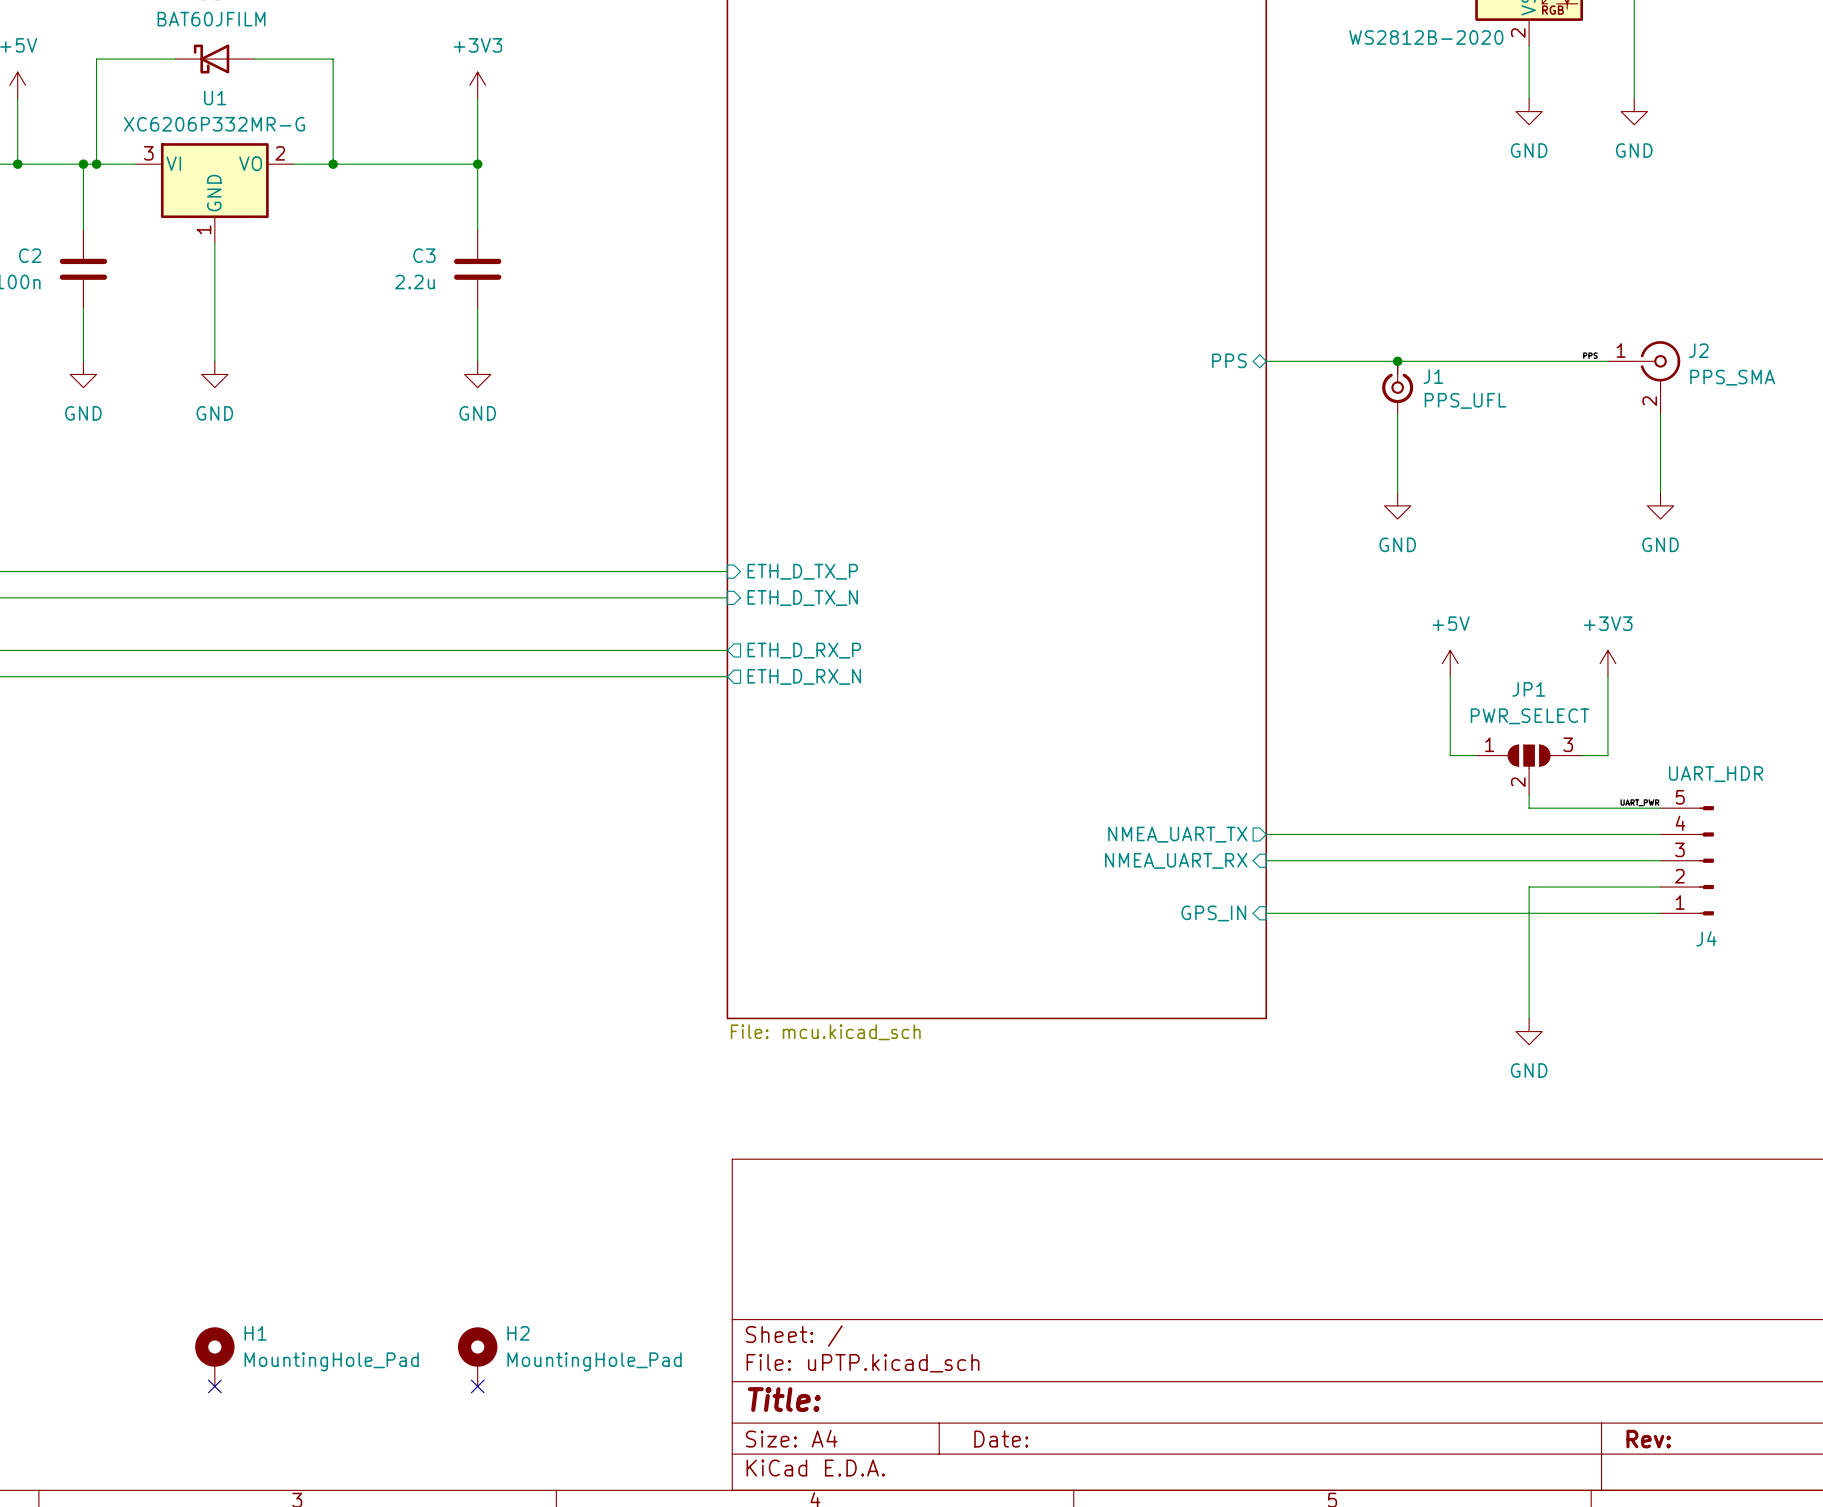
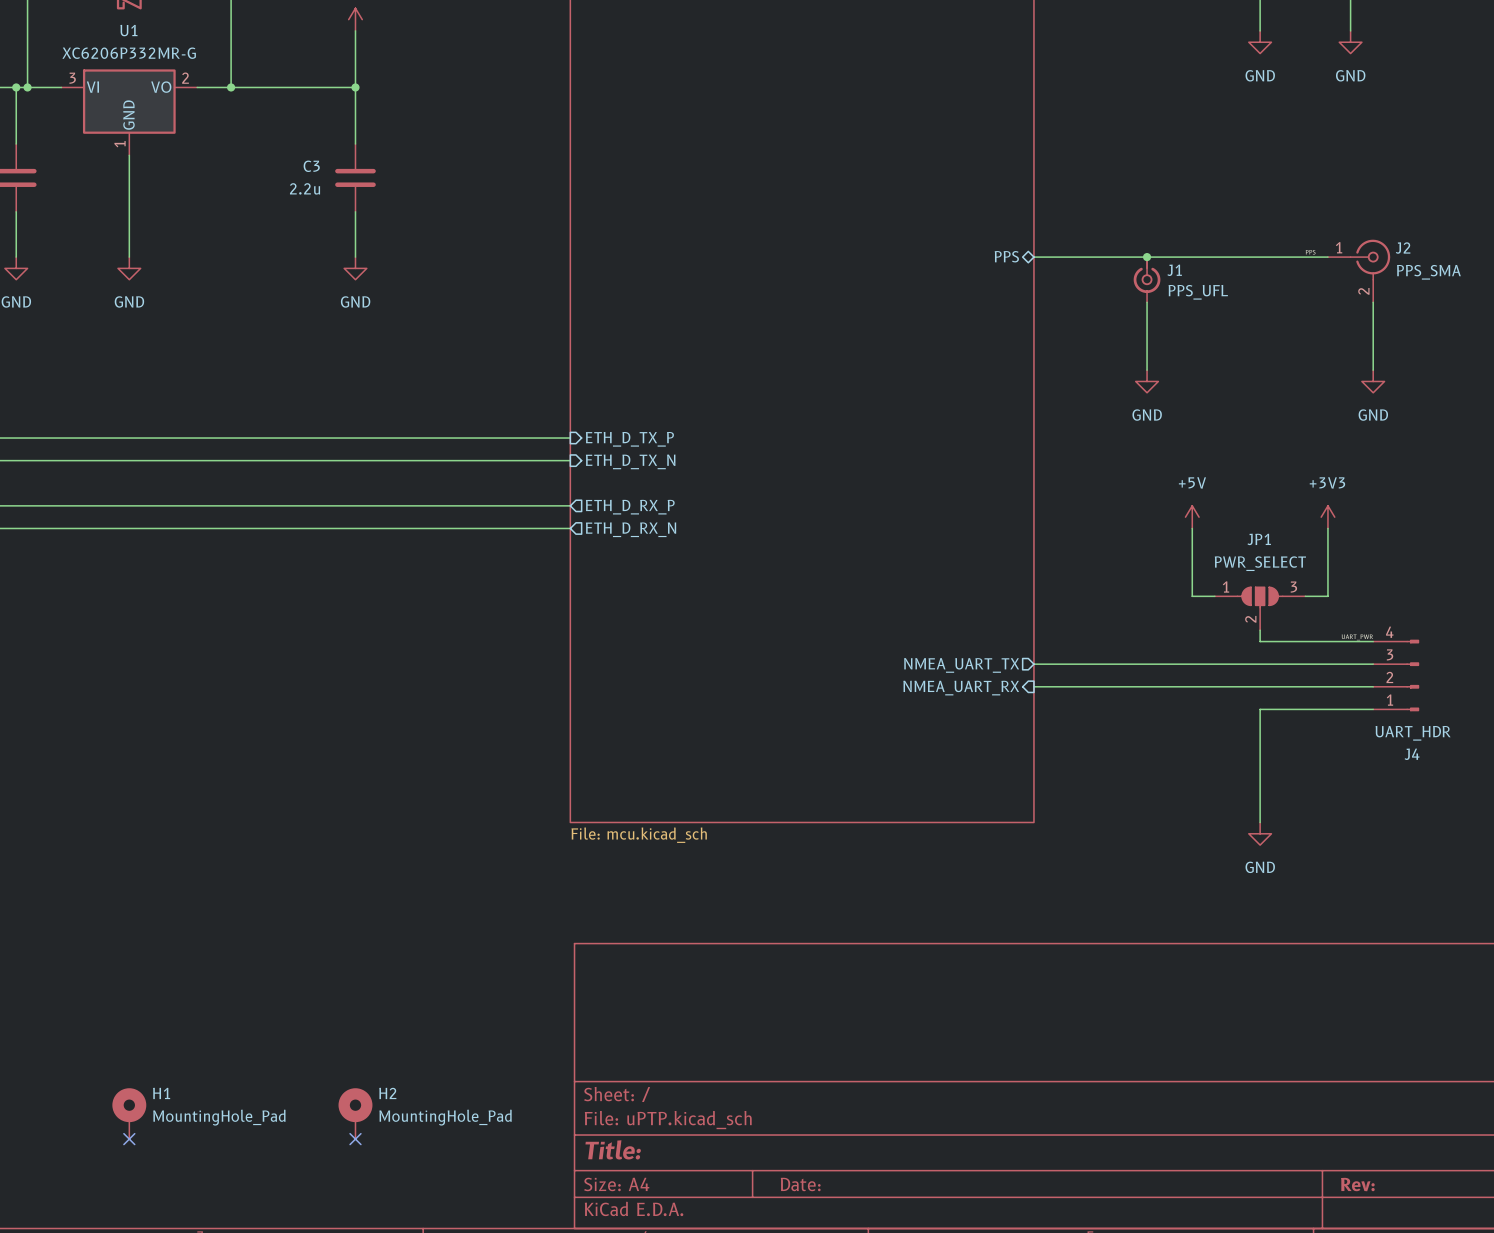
J4 value position: UART_HDR (1716, 774) -> UART_HDR (1413, 733)
J4 symbol: [1660, 806, 1714, 916] -> [1373, 639, 1420, 712]
sheet pin: GPS_IN (1213, 913) -> none
wire: (1266, 913) (1660, 913) -> none

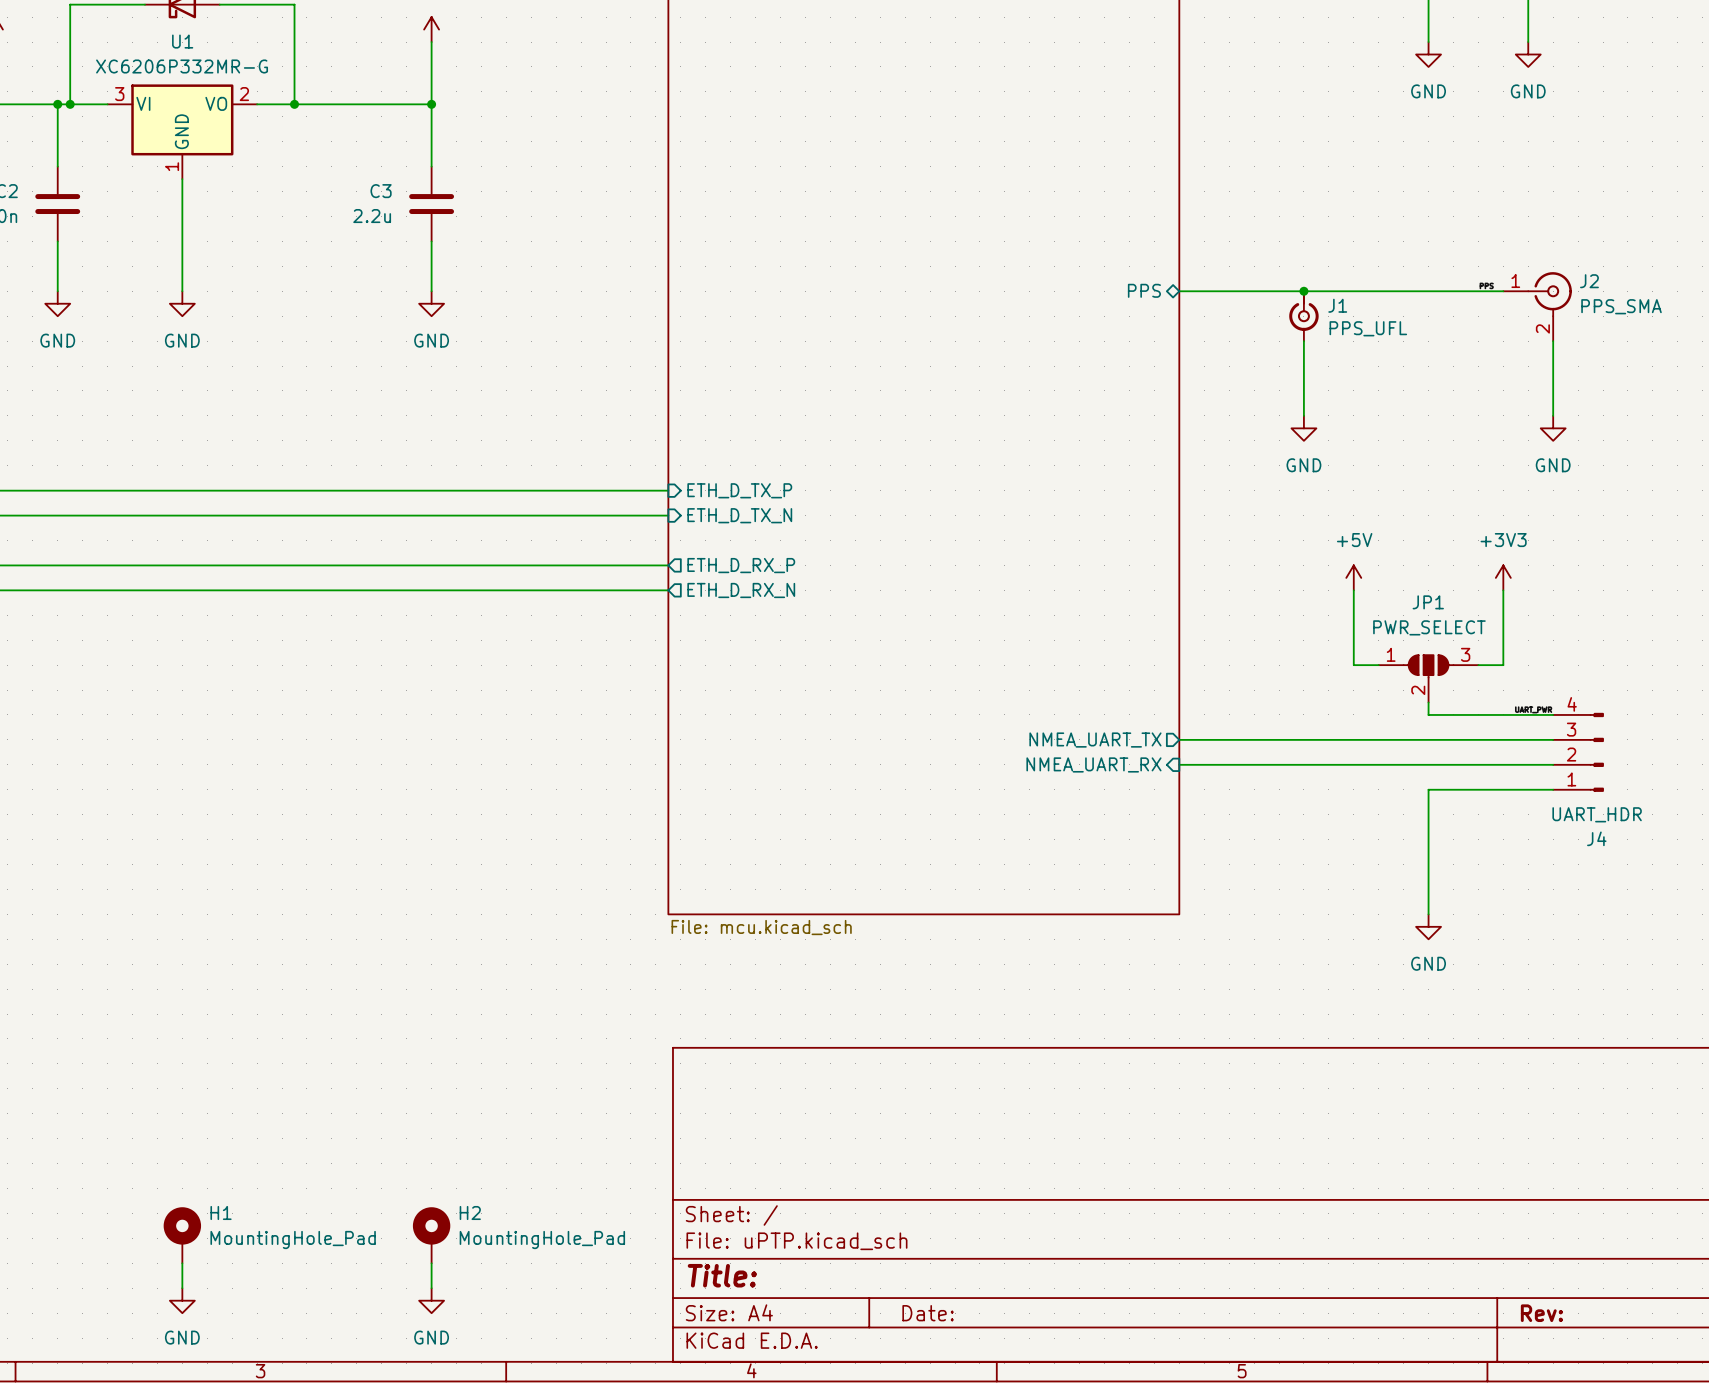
wire: none -> (182, 1263) (182, 1288)
no-connect mark: (129, 1139) -> none
wire: none -> (431, 1263) (431, 1288)
no-connect mark: (355, 1139) -> none
power symbol: none -> GND (182, 1300)
power symbol: none -> GND (431, 1300)

